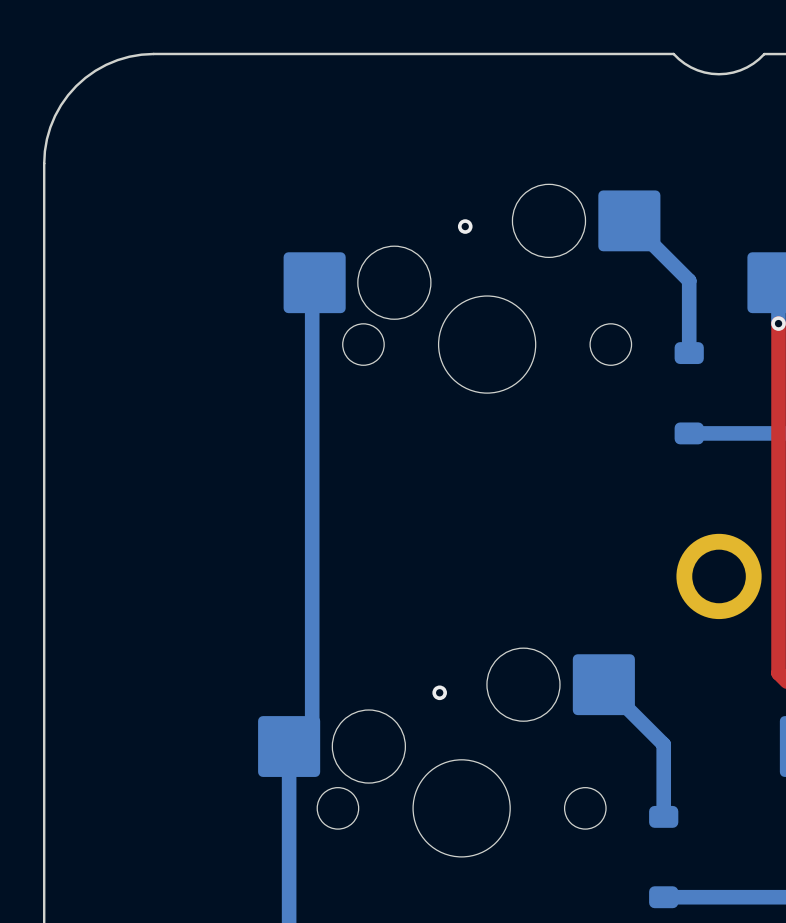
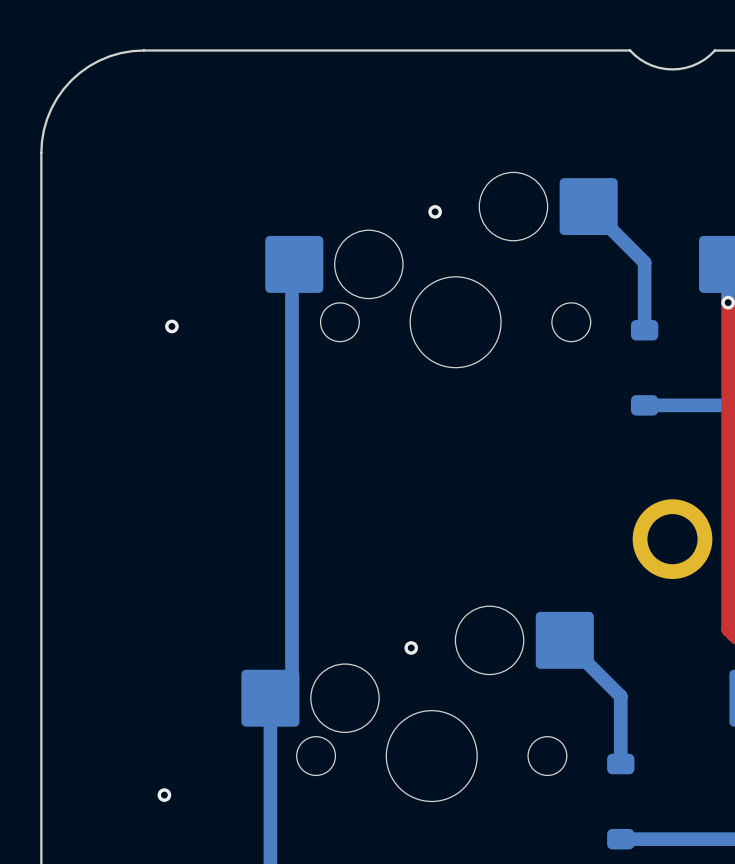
via: none -> (171, 326)
via: none -> (164, 795)

